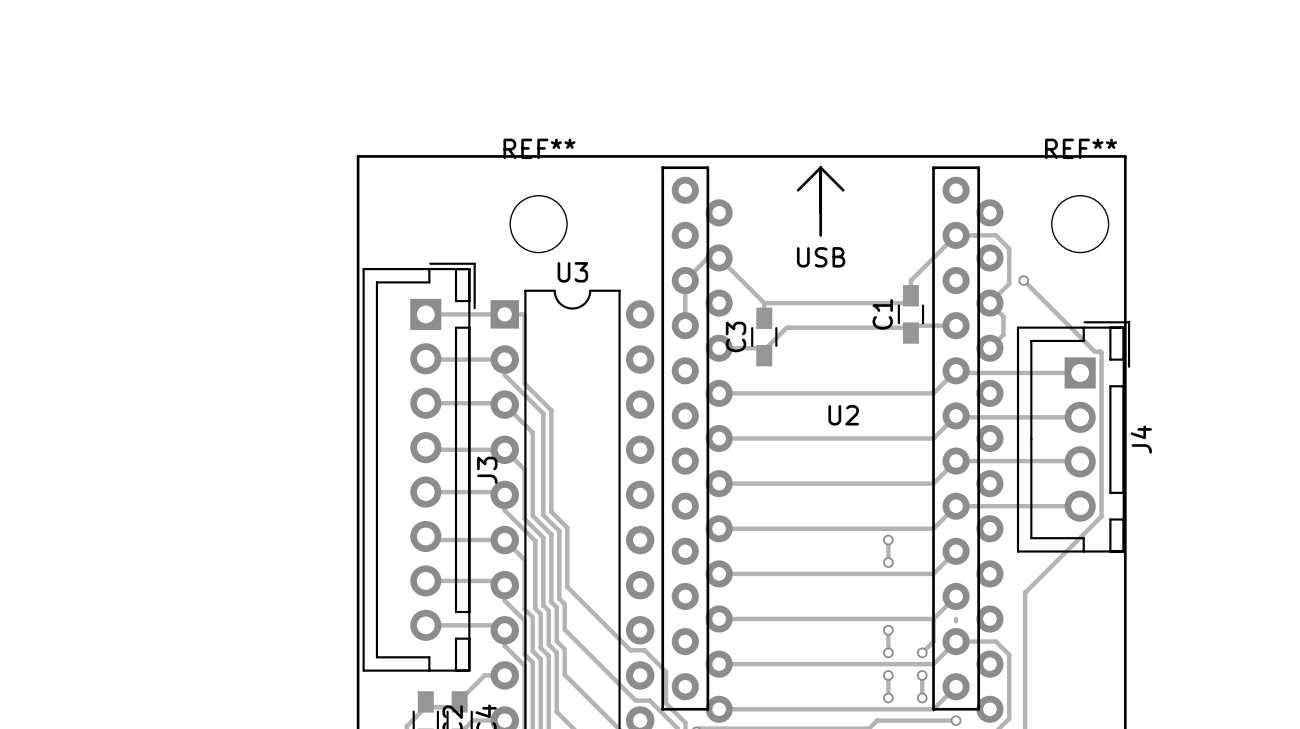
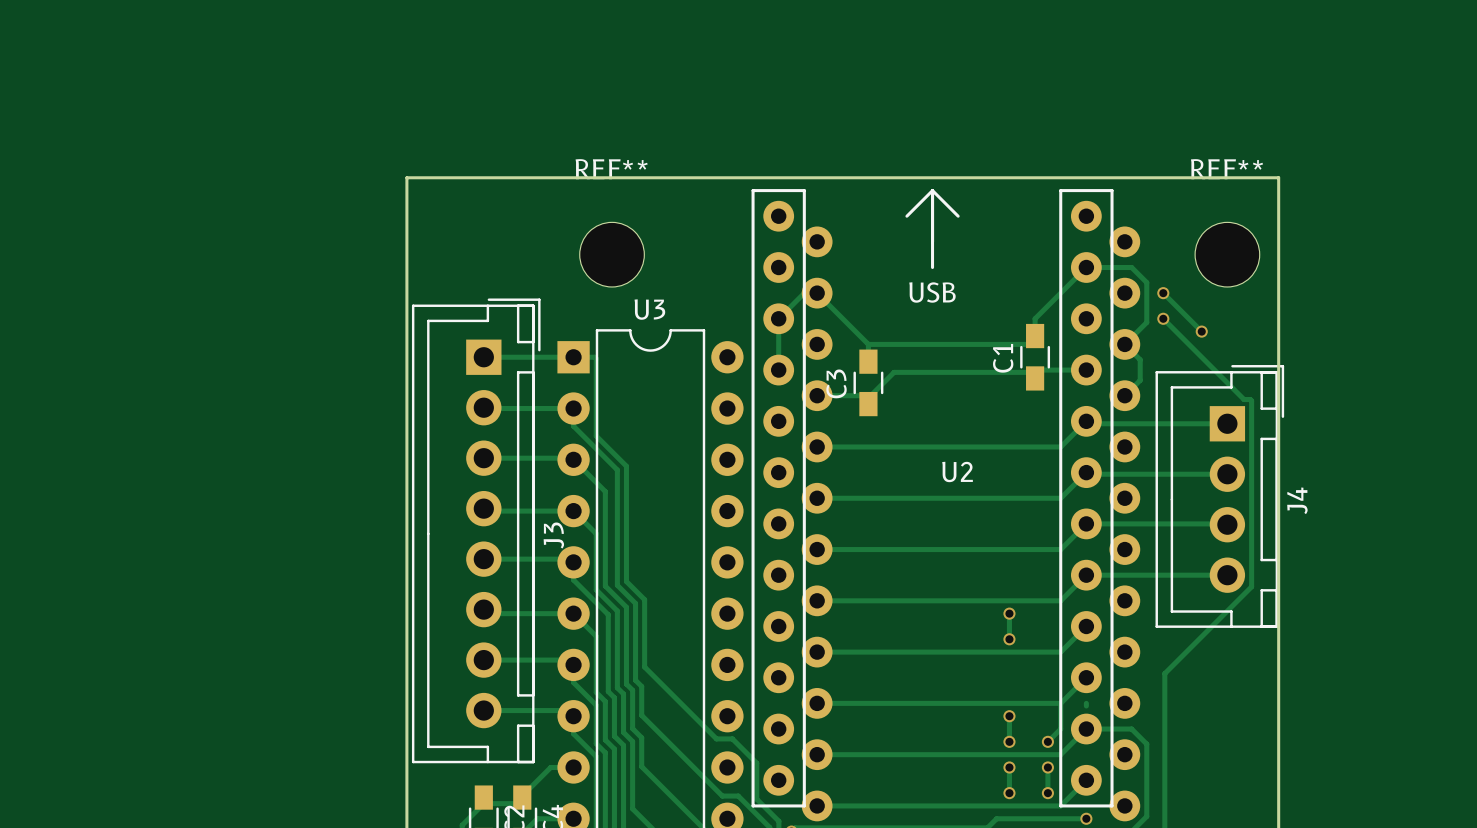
track: none -> (1163, 293) (1201, 331)
via: none -> (1163, 293)
via: none -> (1201, 331)

